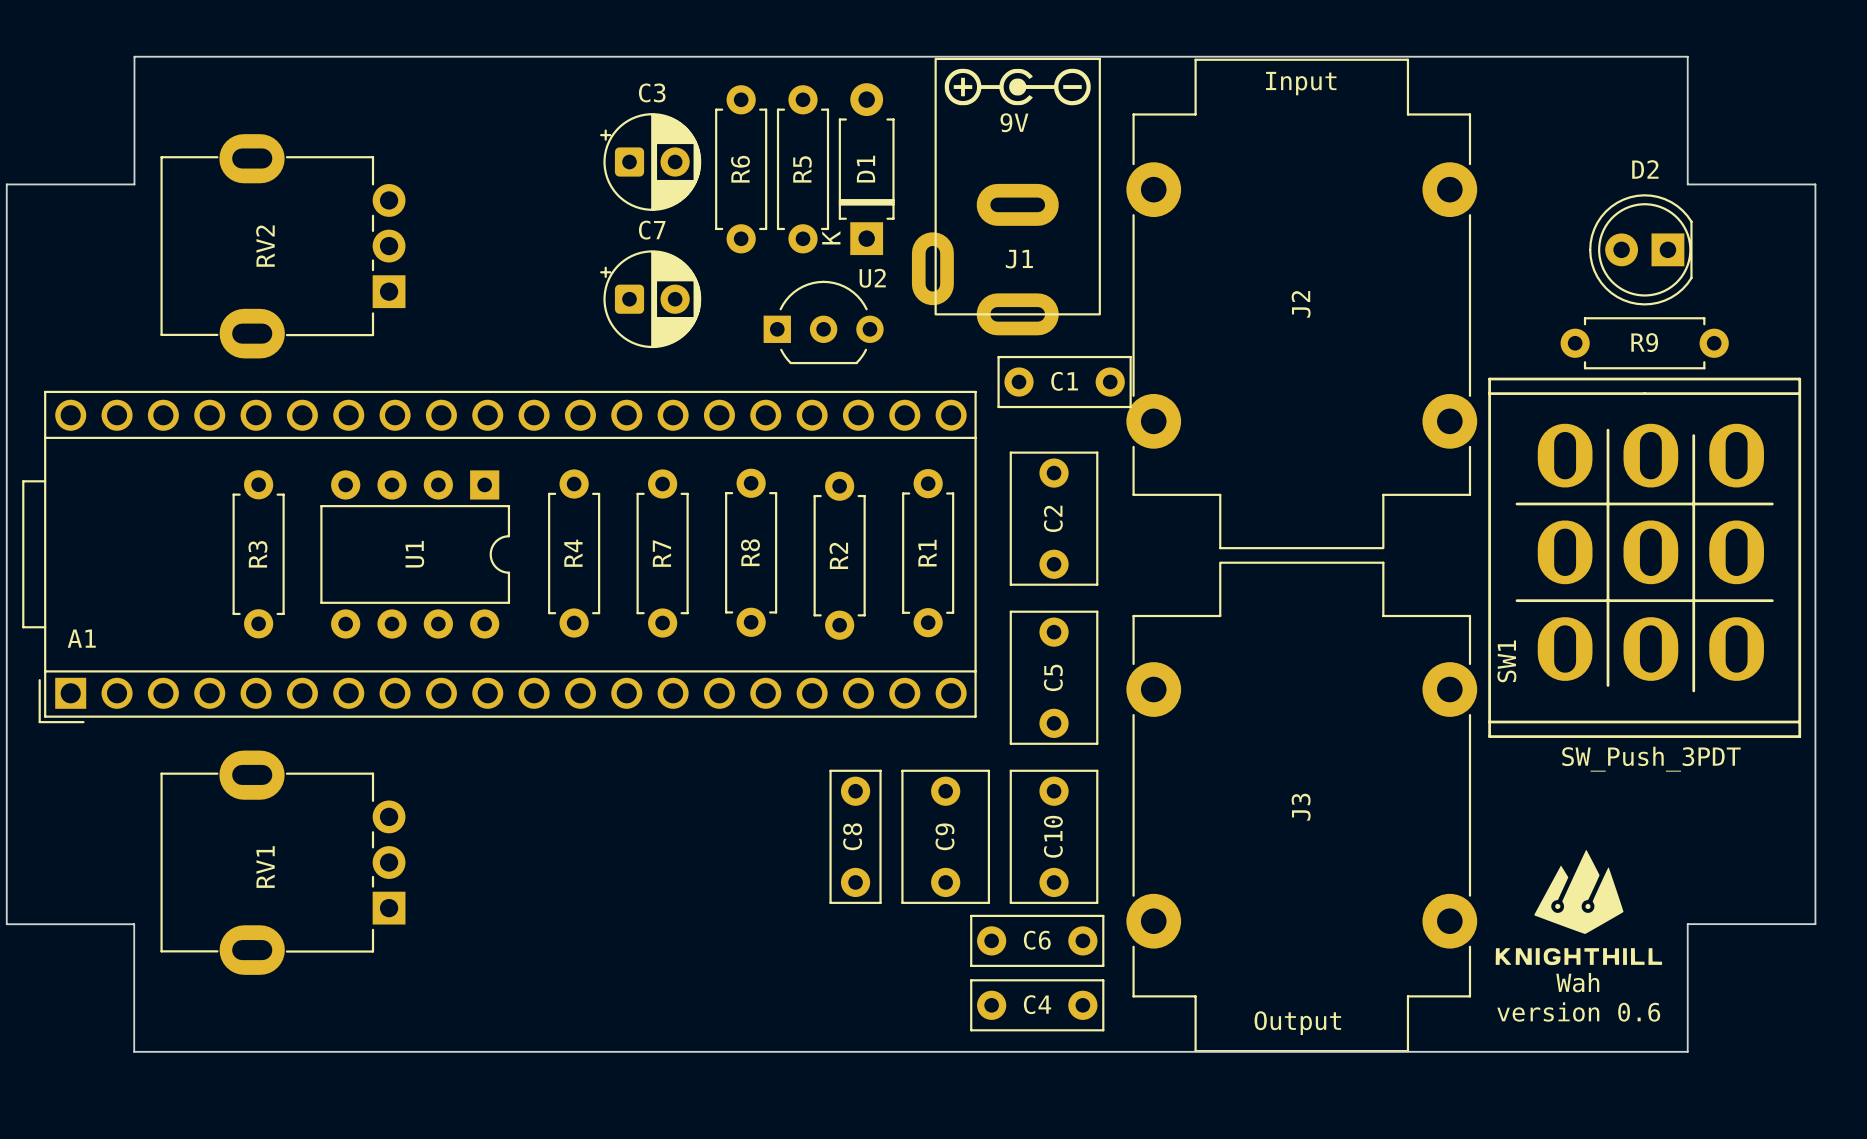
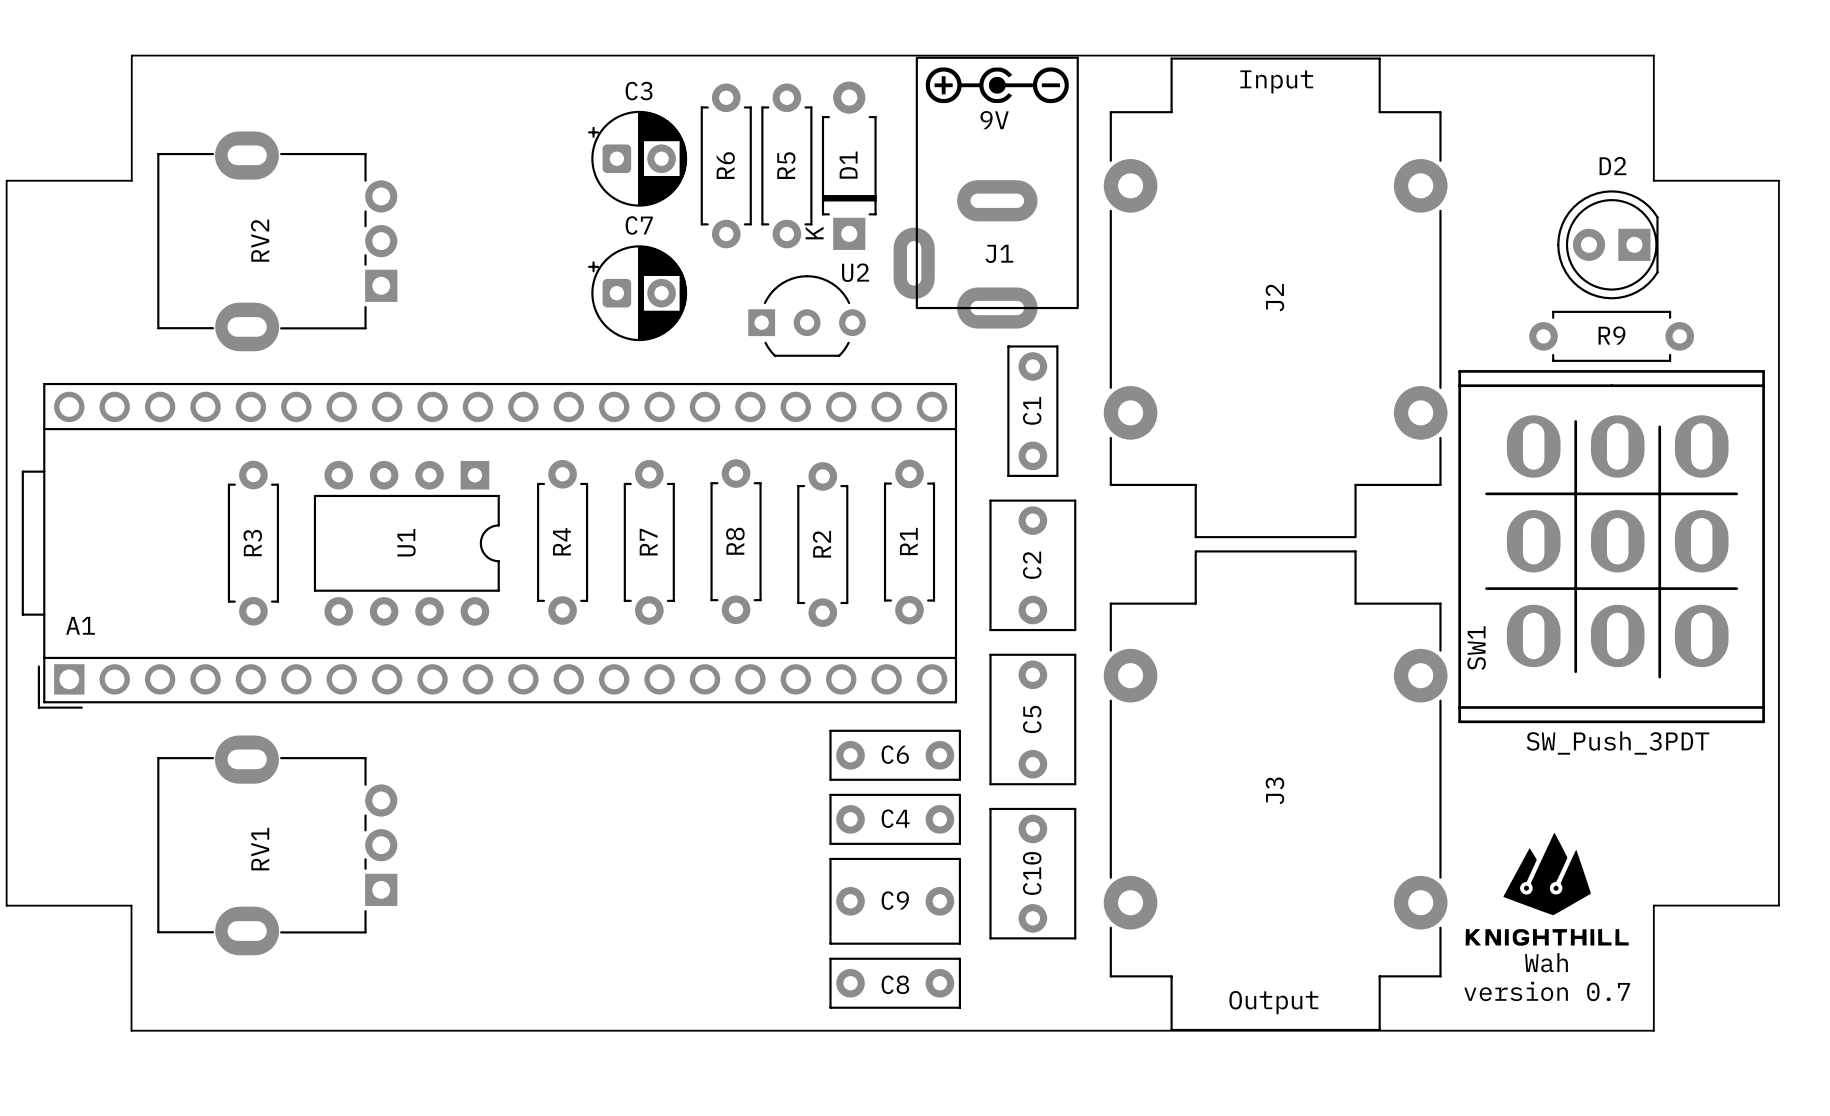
C1 rotation: 0° (1064, 382) -> 90° clockwise (1032, 411)
C2 position: (1054, 518) -> (1032, 565)
C5 position: (1054, 677) -> (1032, 719)
C8 rotation: 0° (855, 836) -> 90° clockwise (895, 983)
C8 position: (855, 836) -> (895, 983)
C9 rotation: 0° (945, 836) -> 90° clockwise (895, 901)
C9 position: (945, 836) -> (895, 901)
C10 position: (1054, 836) -> (1032, 873)
C6 position: (1037, 940) -> (895, 755)
C4 position: (1037, 1005) -> (895, 819)
text: version 0.6 (1578, 1012) -> version 0.7 (1547, 991)

